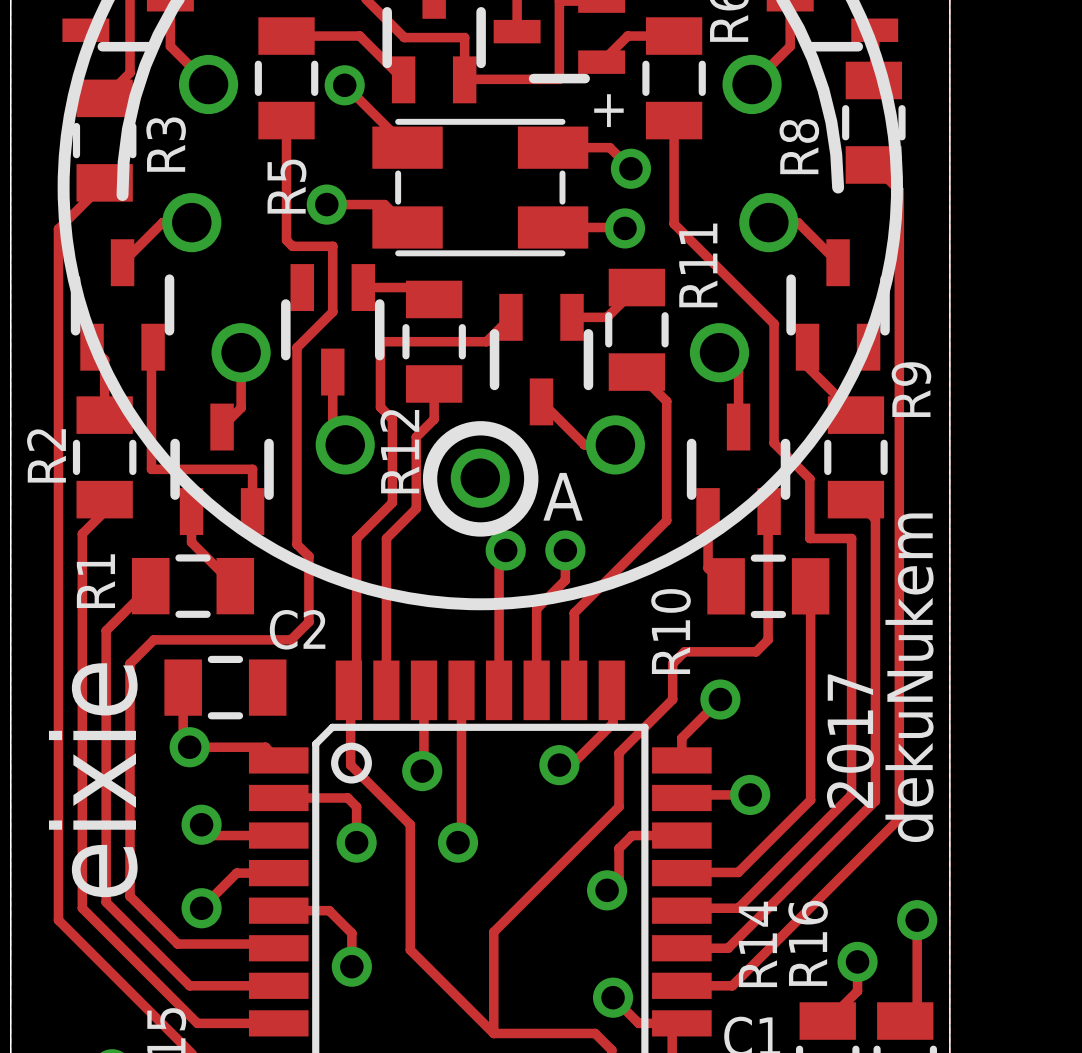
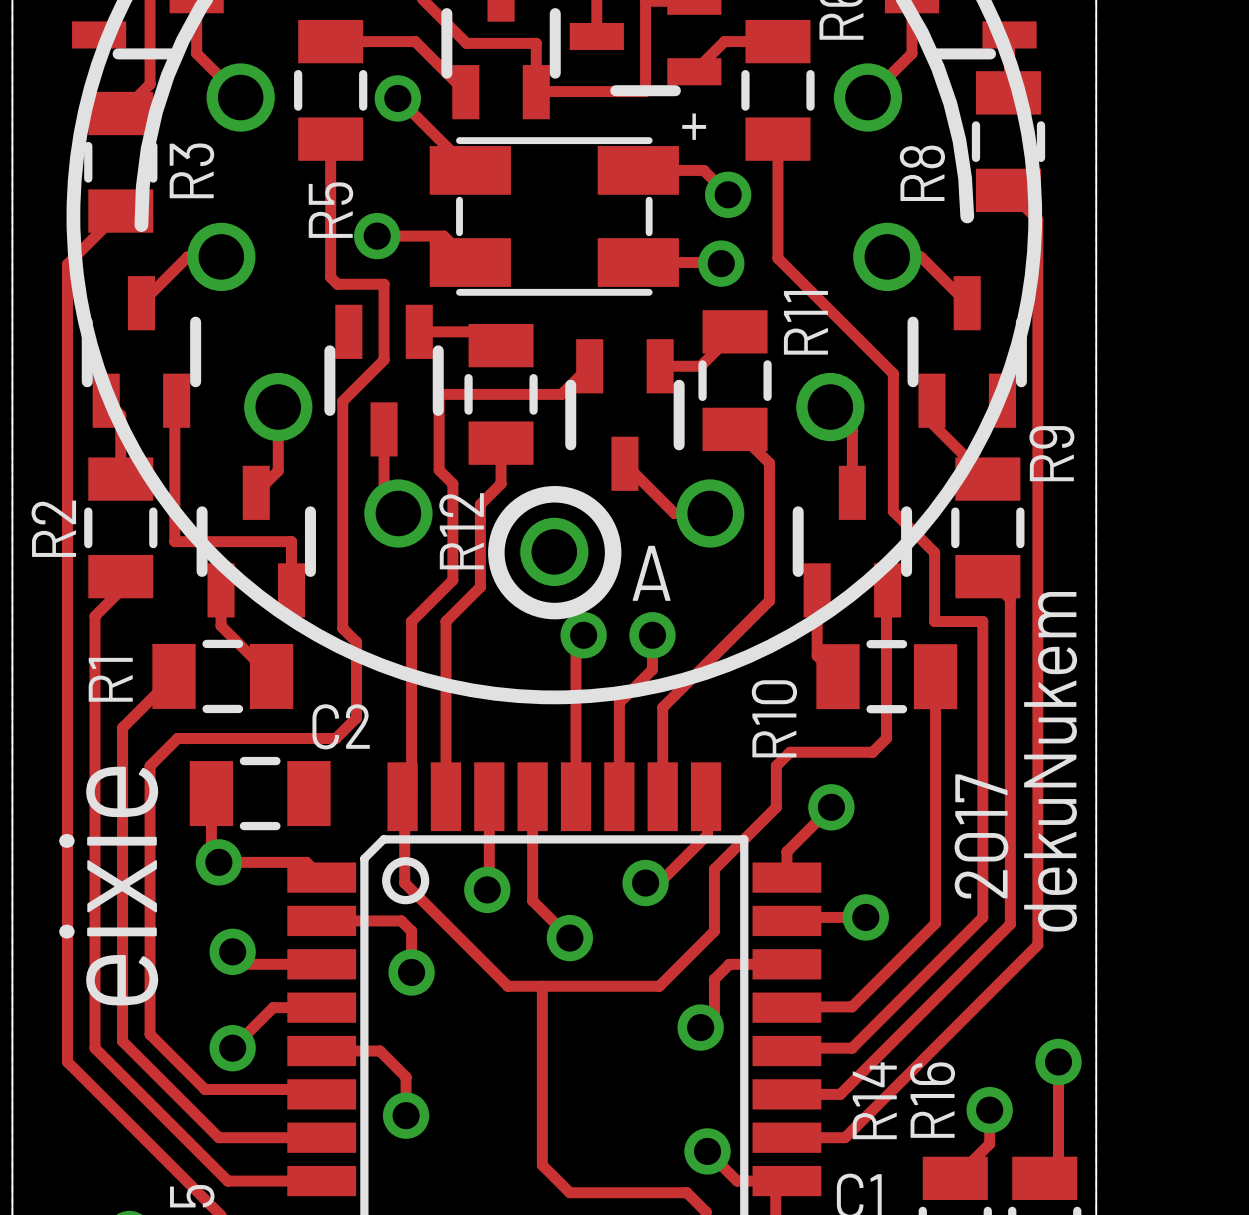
track: (461, 780) (461, 839) (458, 842) -> (532, 900) (569, 938)
track: (410, 824) (410, 949) (469, 1009) -> (542, 986) (542, 1165)
via position: (458, 842) -> (569, 938)
track: (571, 854) (493, 932) (493, 1033) -> (659, 986) (507, 986) (473, 951)

